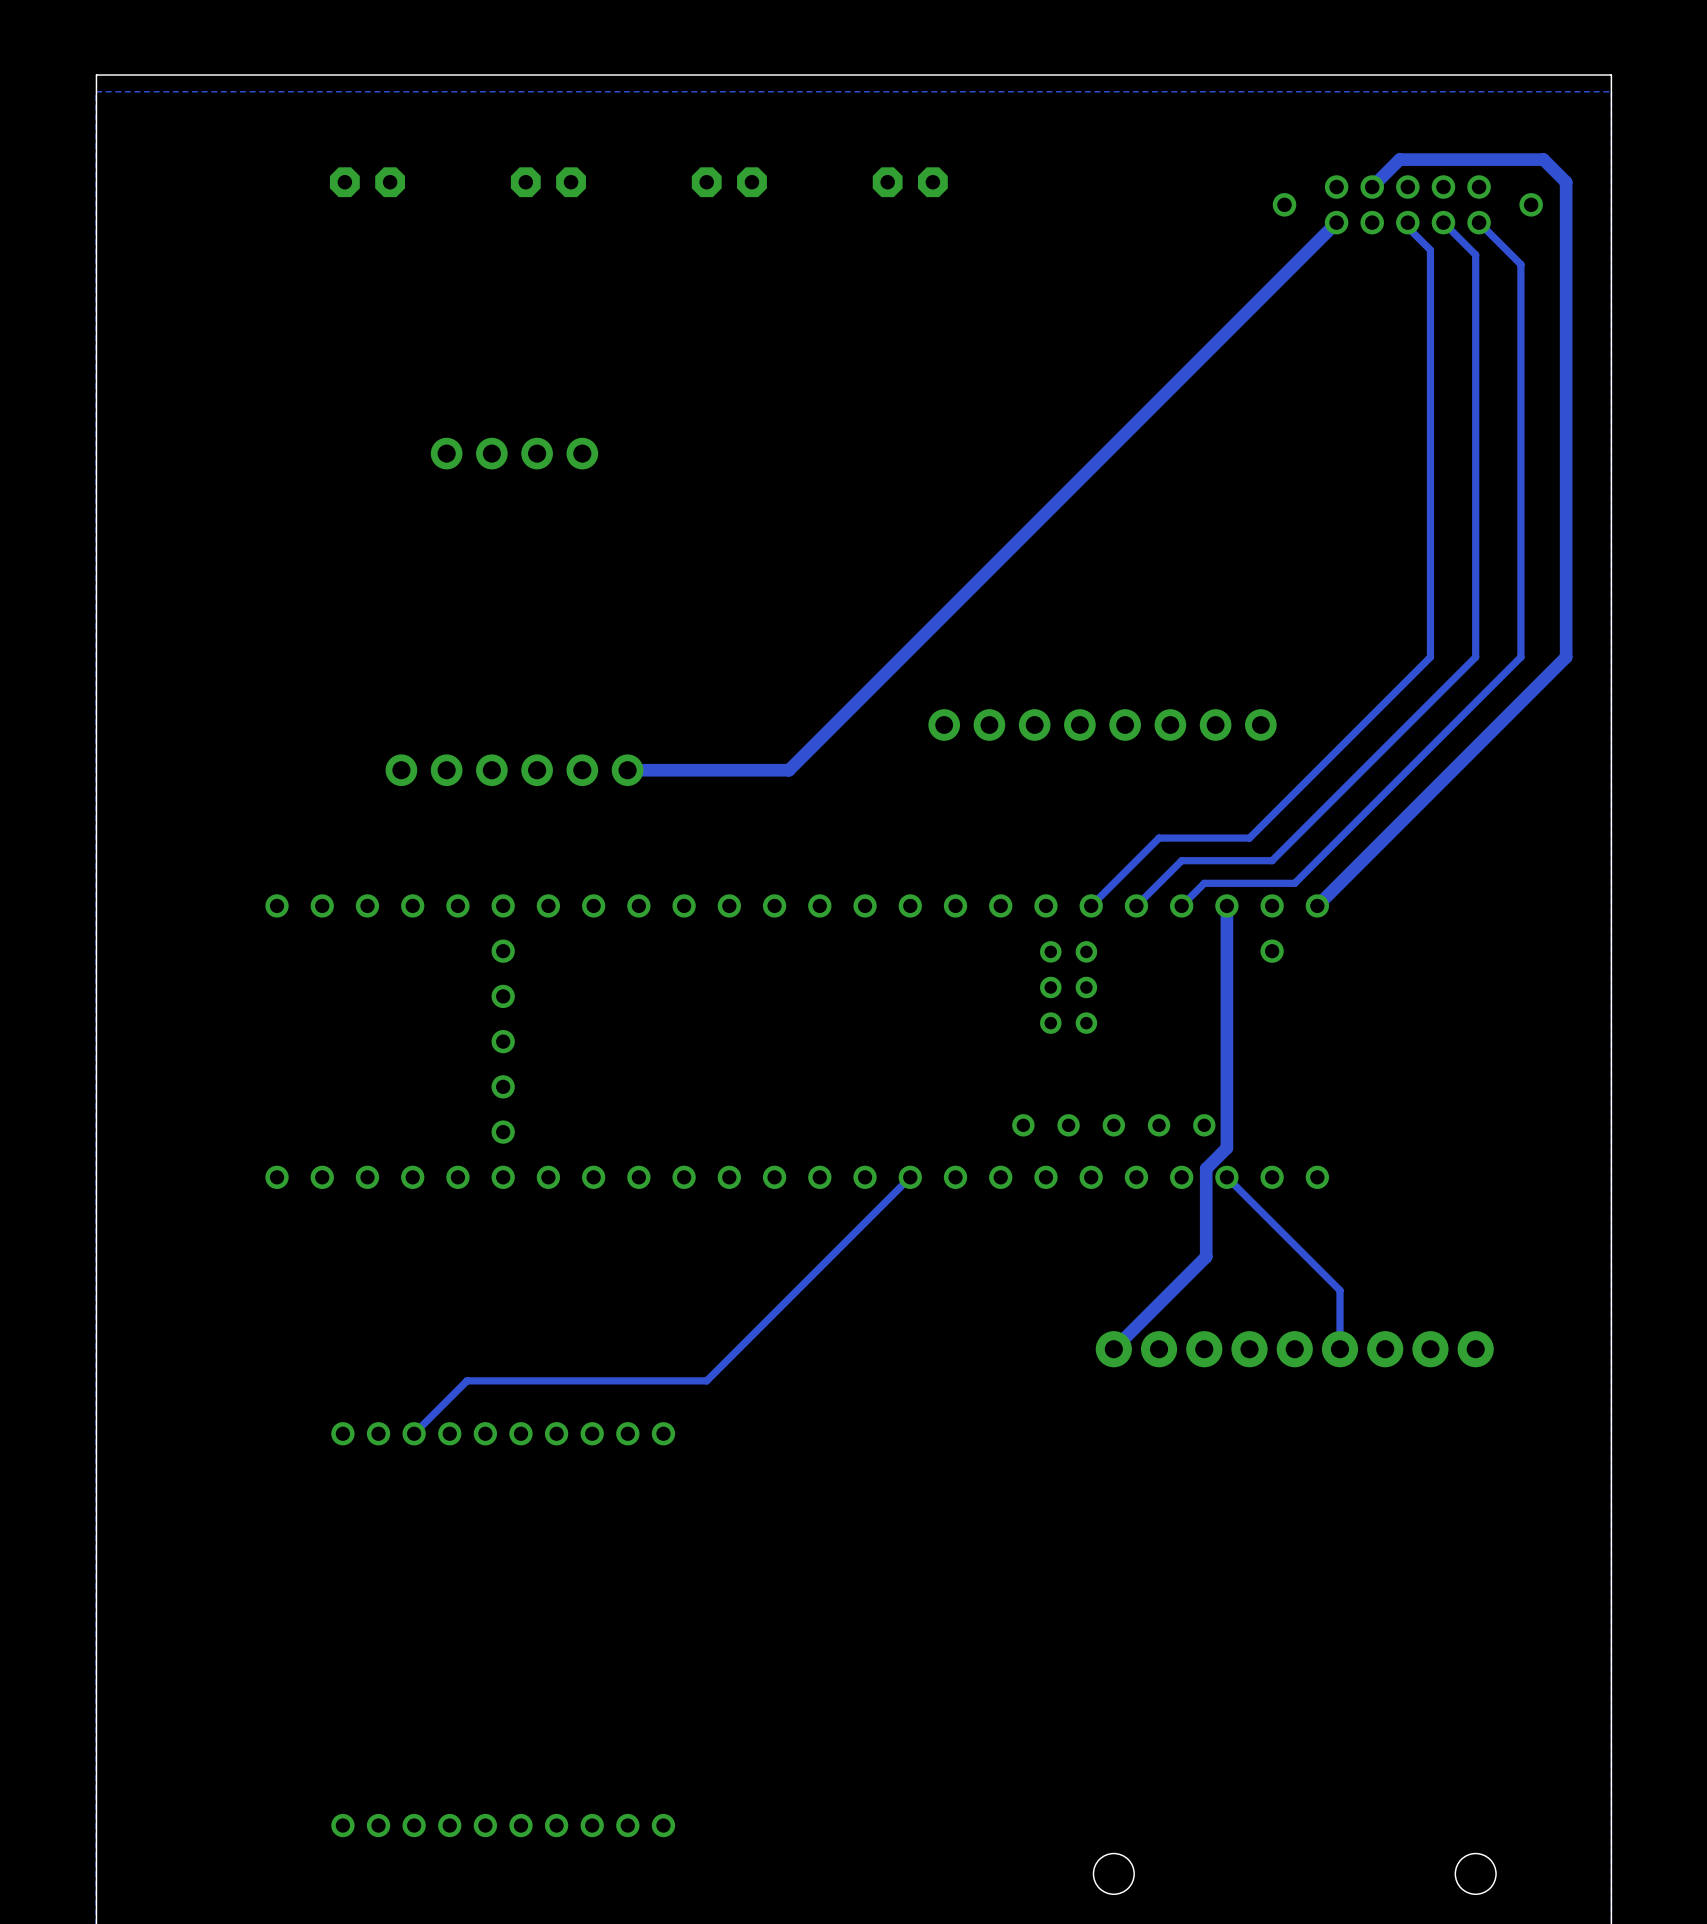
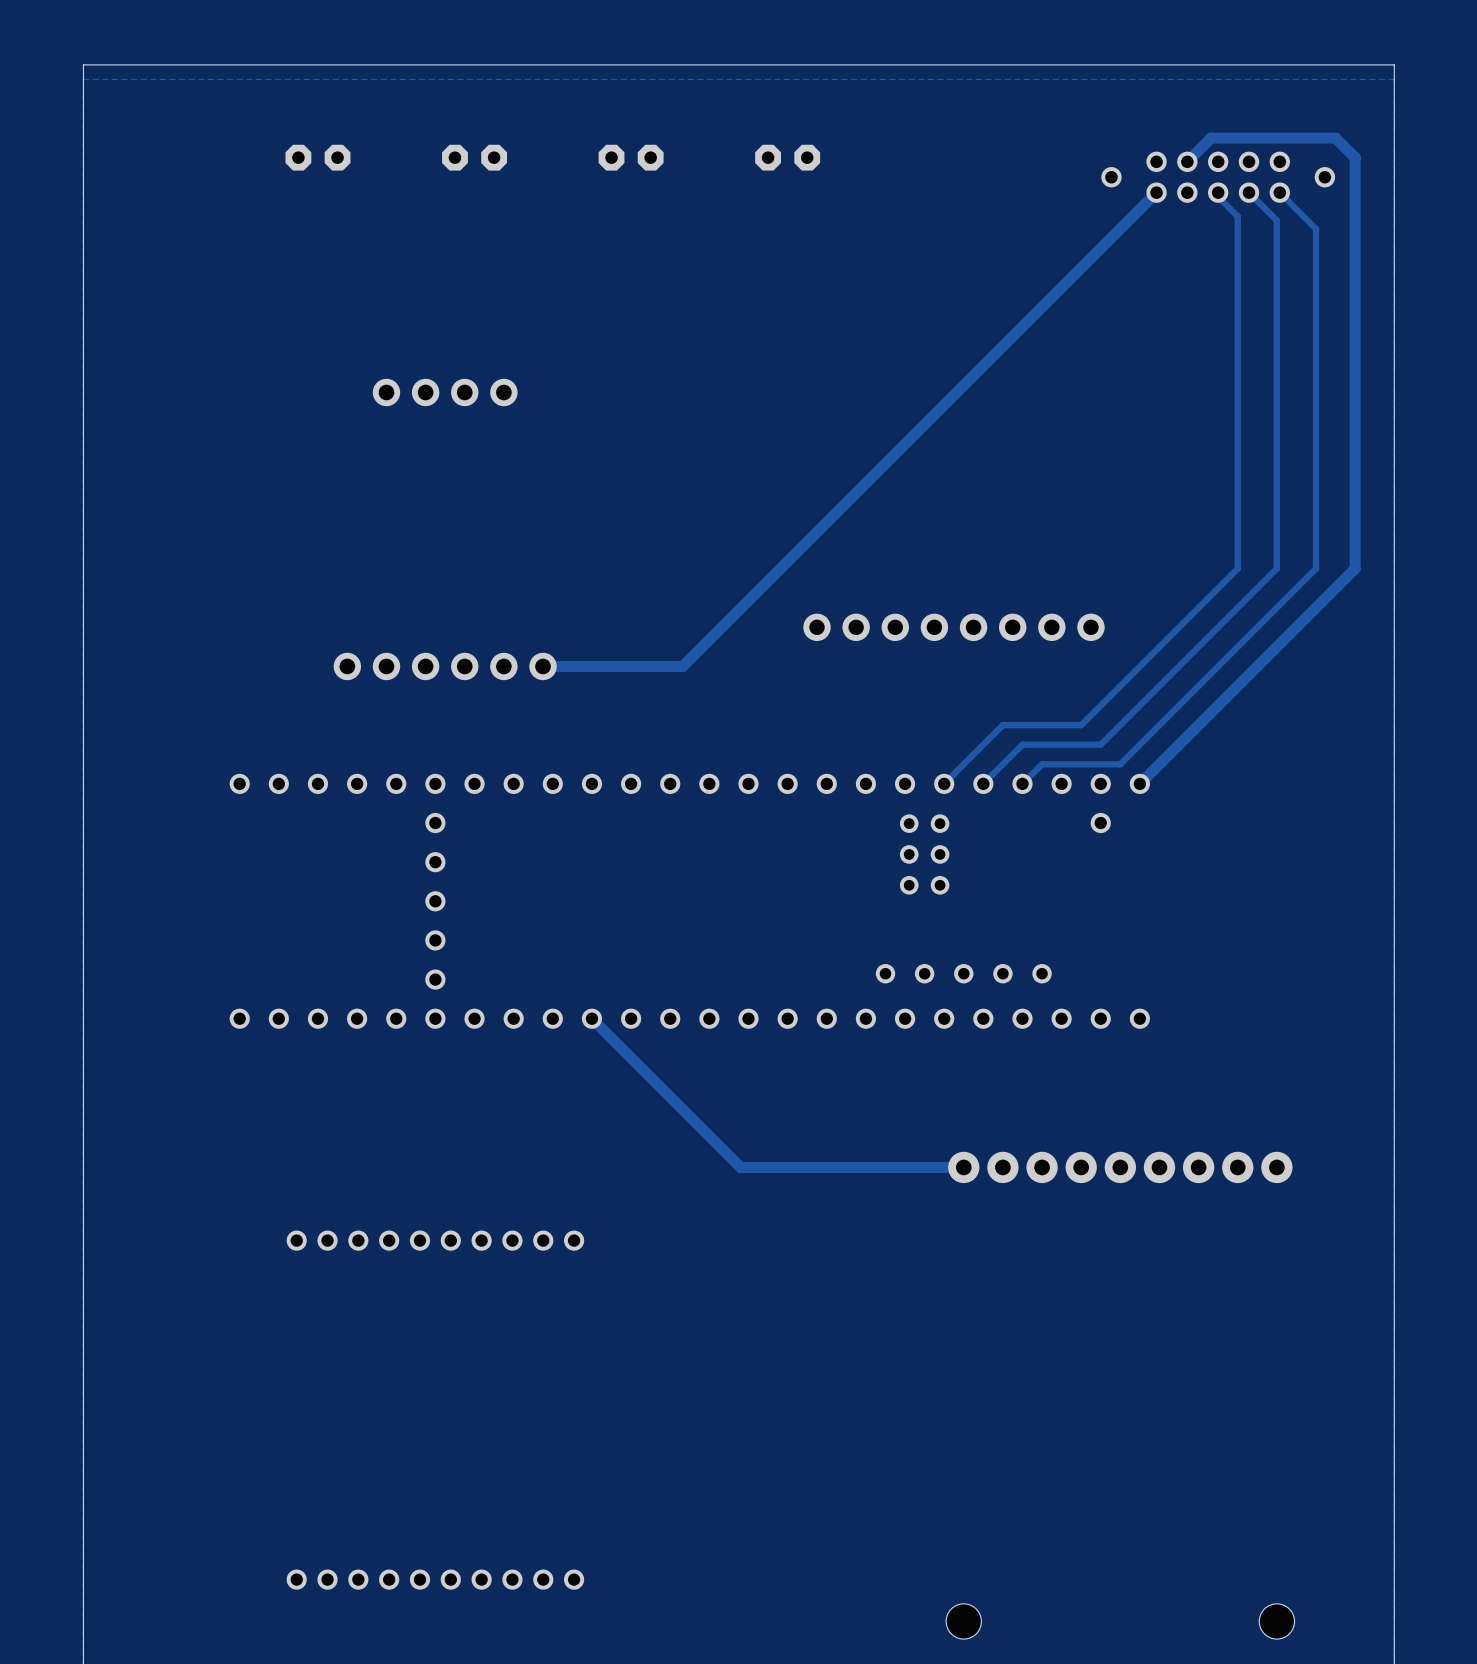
track: (1226, 905) (1226, 1148) (1206, 1168) (1206, 1256) (1113, 1349) -> (591, 1018) (740, 1167) (963, 1167)
track: (910, 1177) (706, 1380) (467, 1380) (414, 1433) -> none
track: (1226, 1177) (1339, 1290) (1339, 1349) -> none

